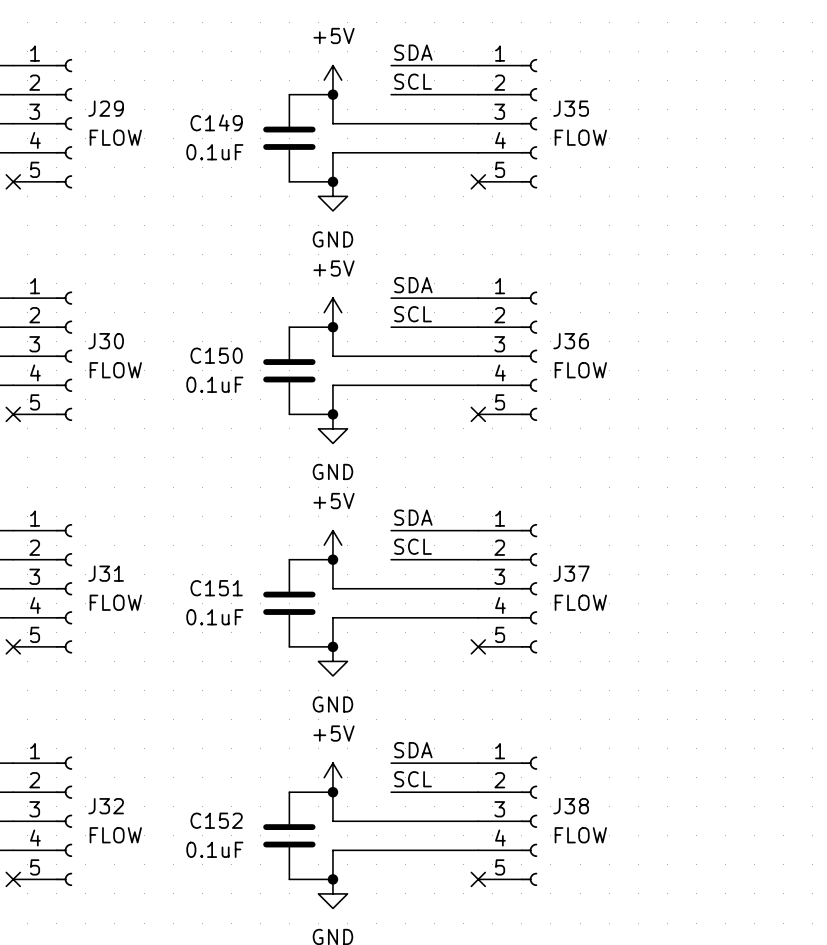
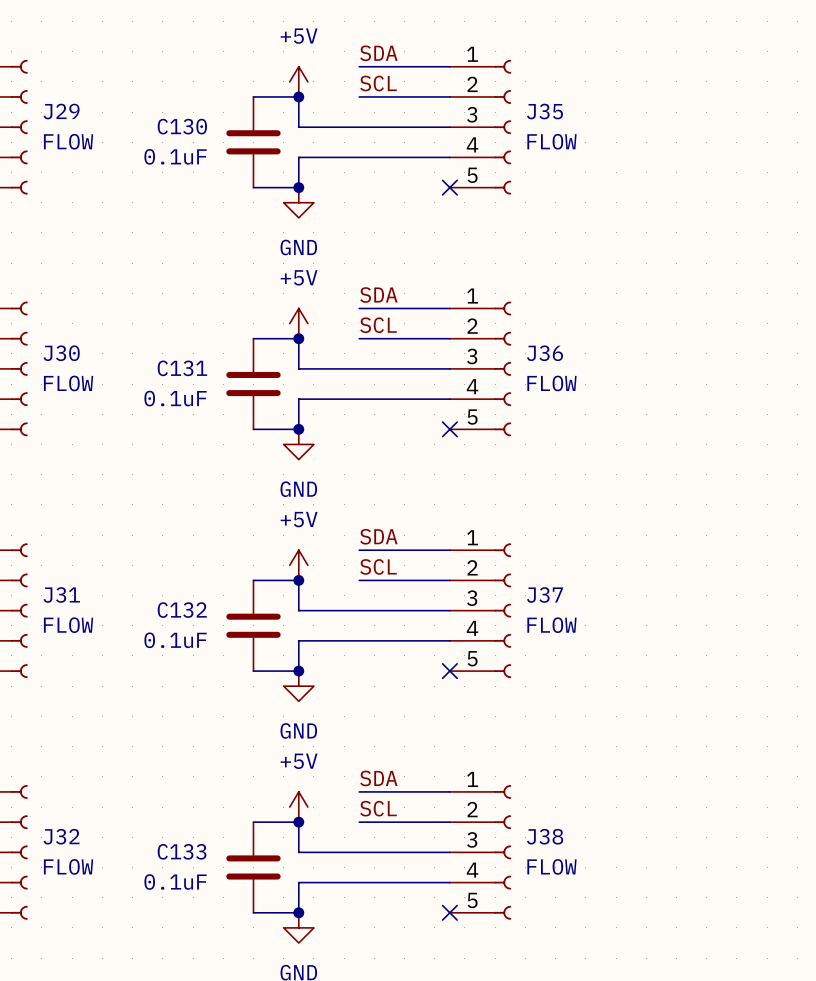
C149 name: C149 (216, 122) -> C130 (182, 126)
C150 name: C150 (216, 355) -> C131 (182, 368)
C151 name: C151 (216, 588) -> C132 (182, 610)
C152 name: C152 (216, 820) -> C133 (182, 851)

